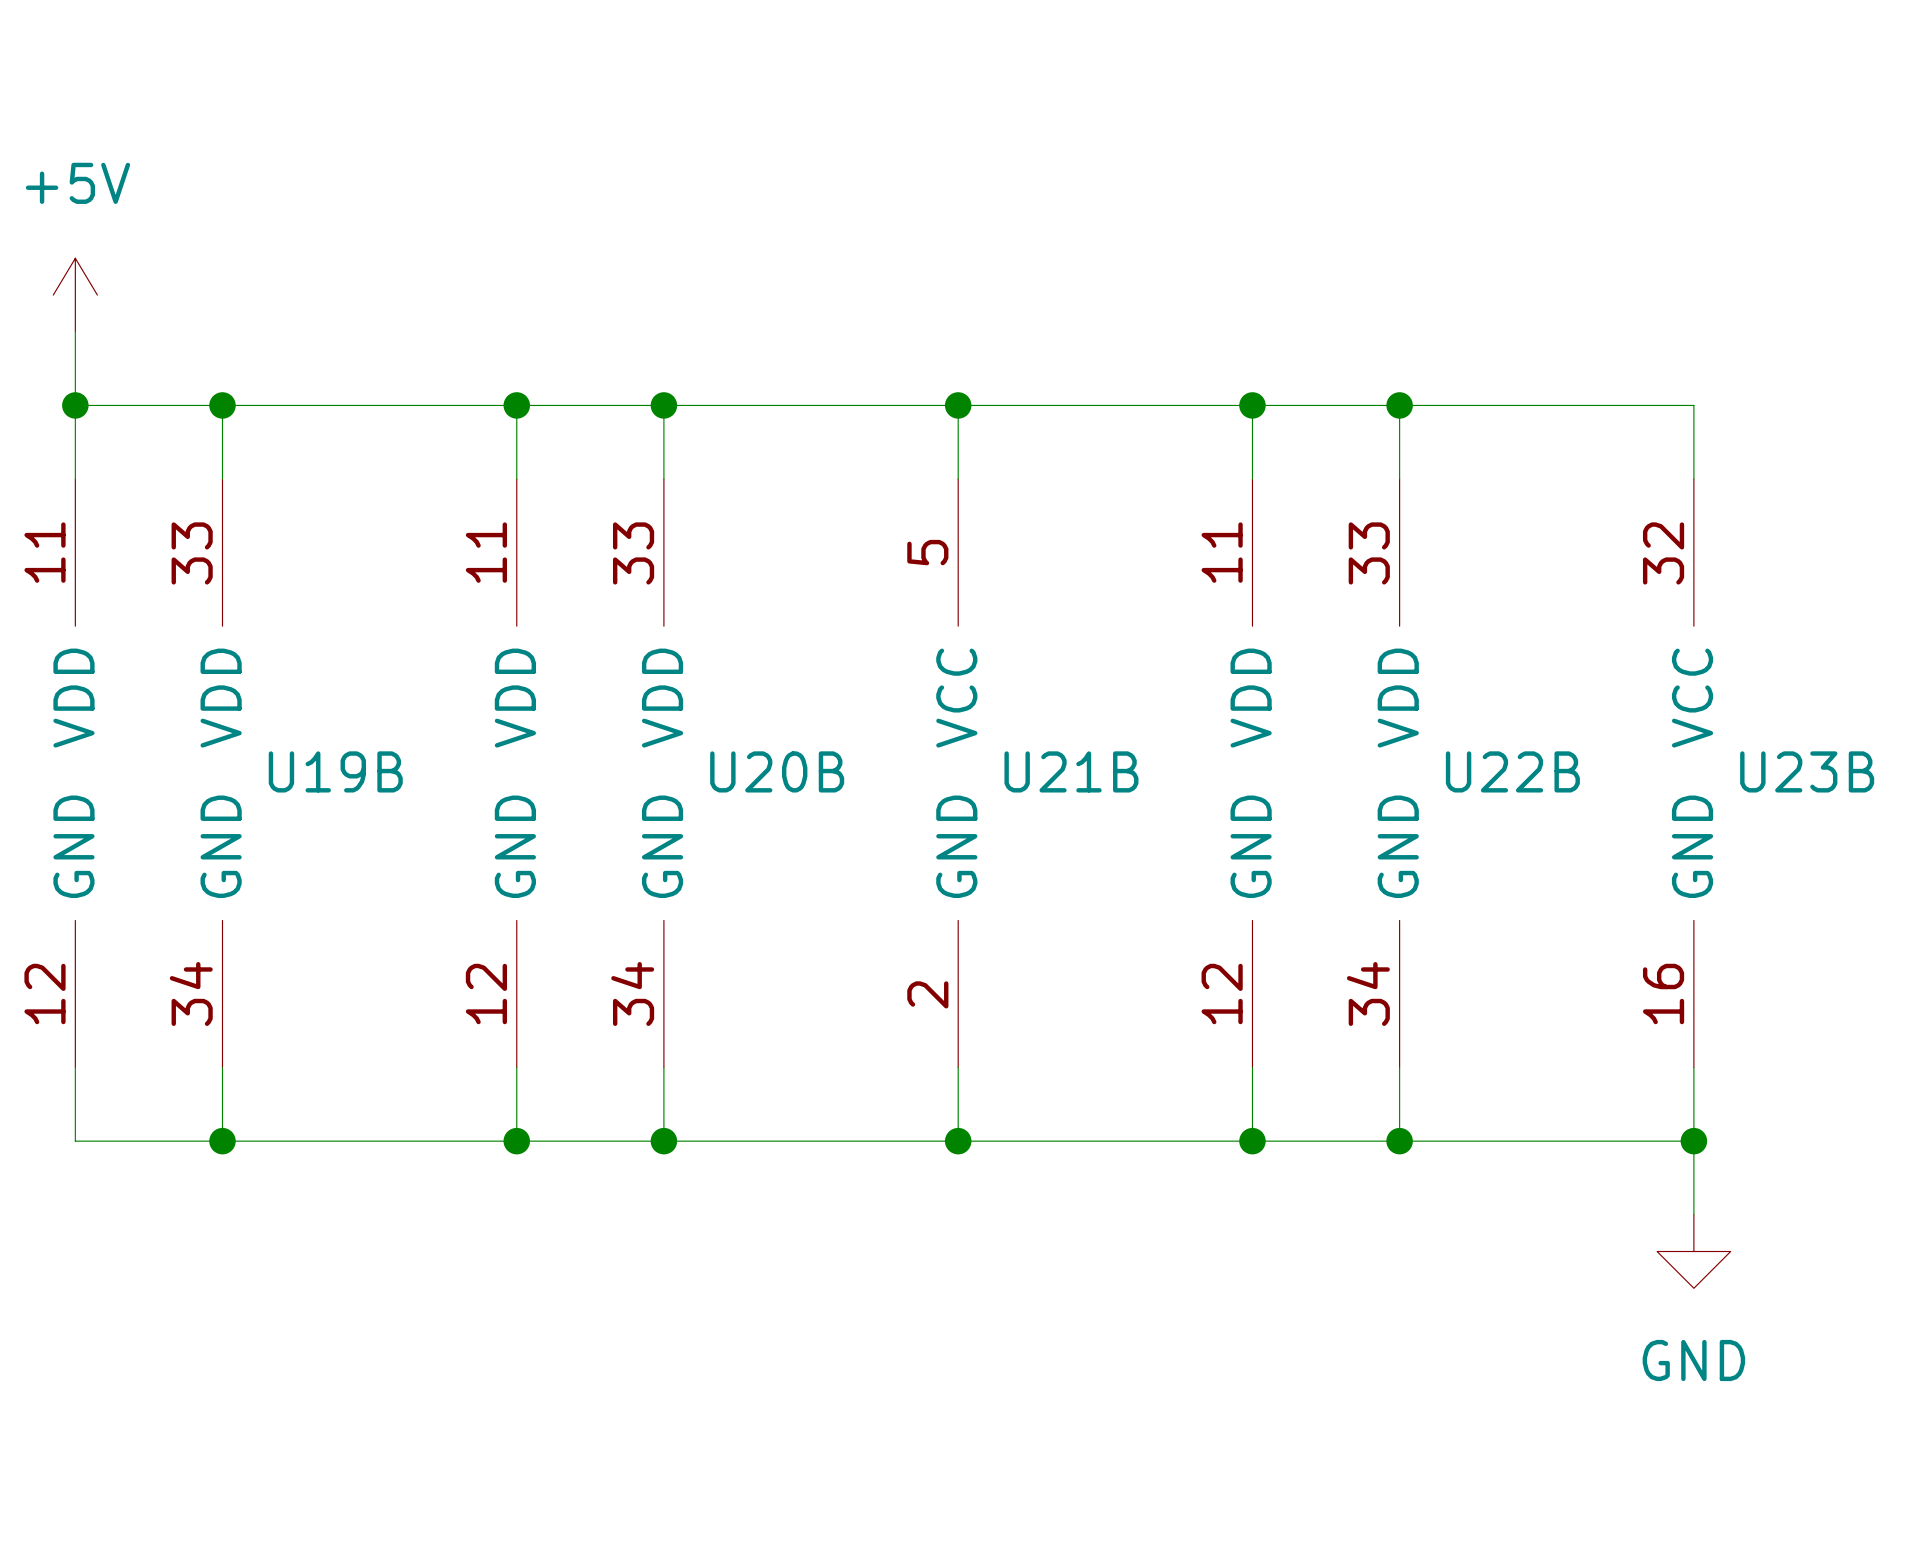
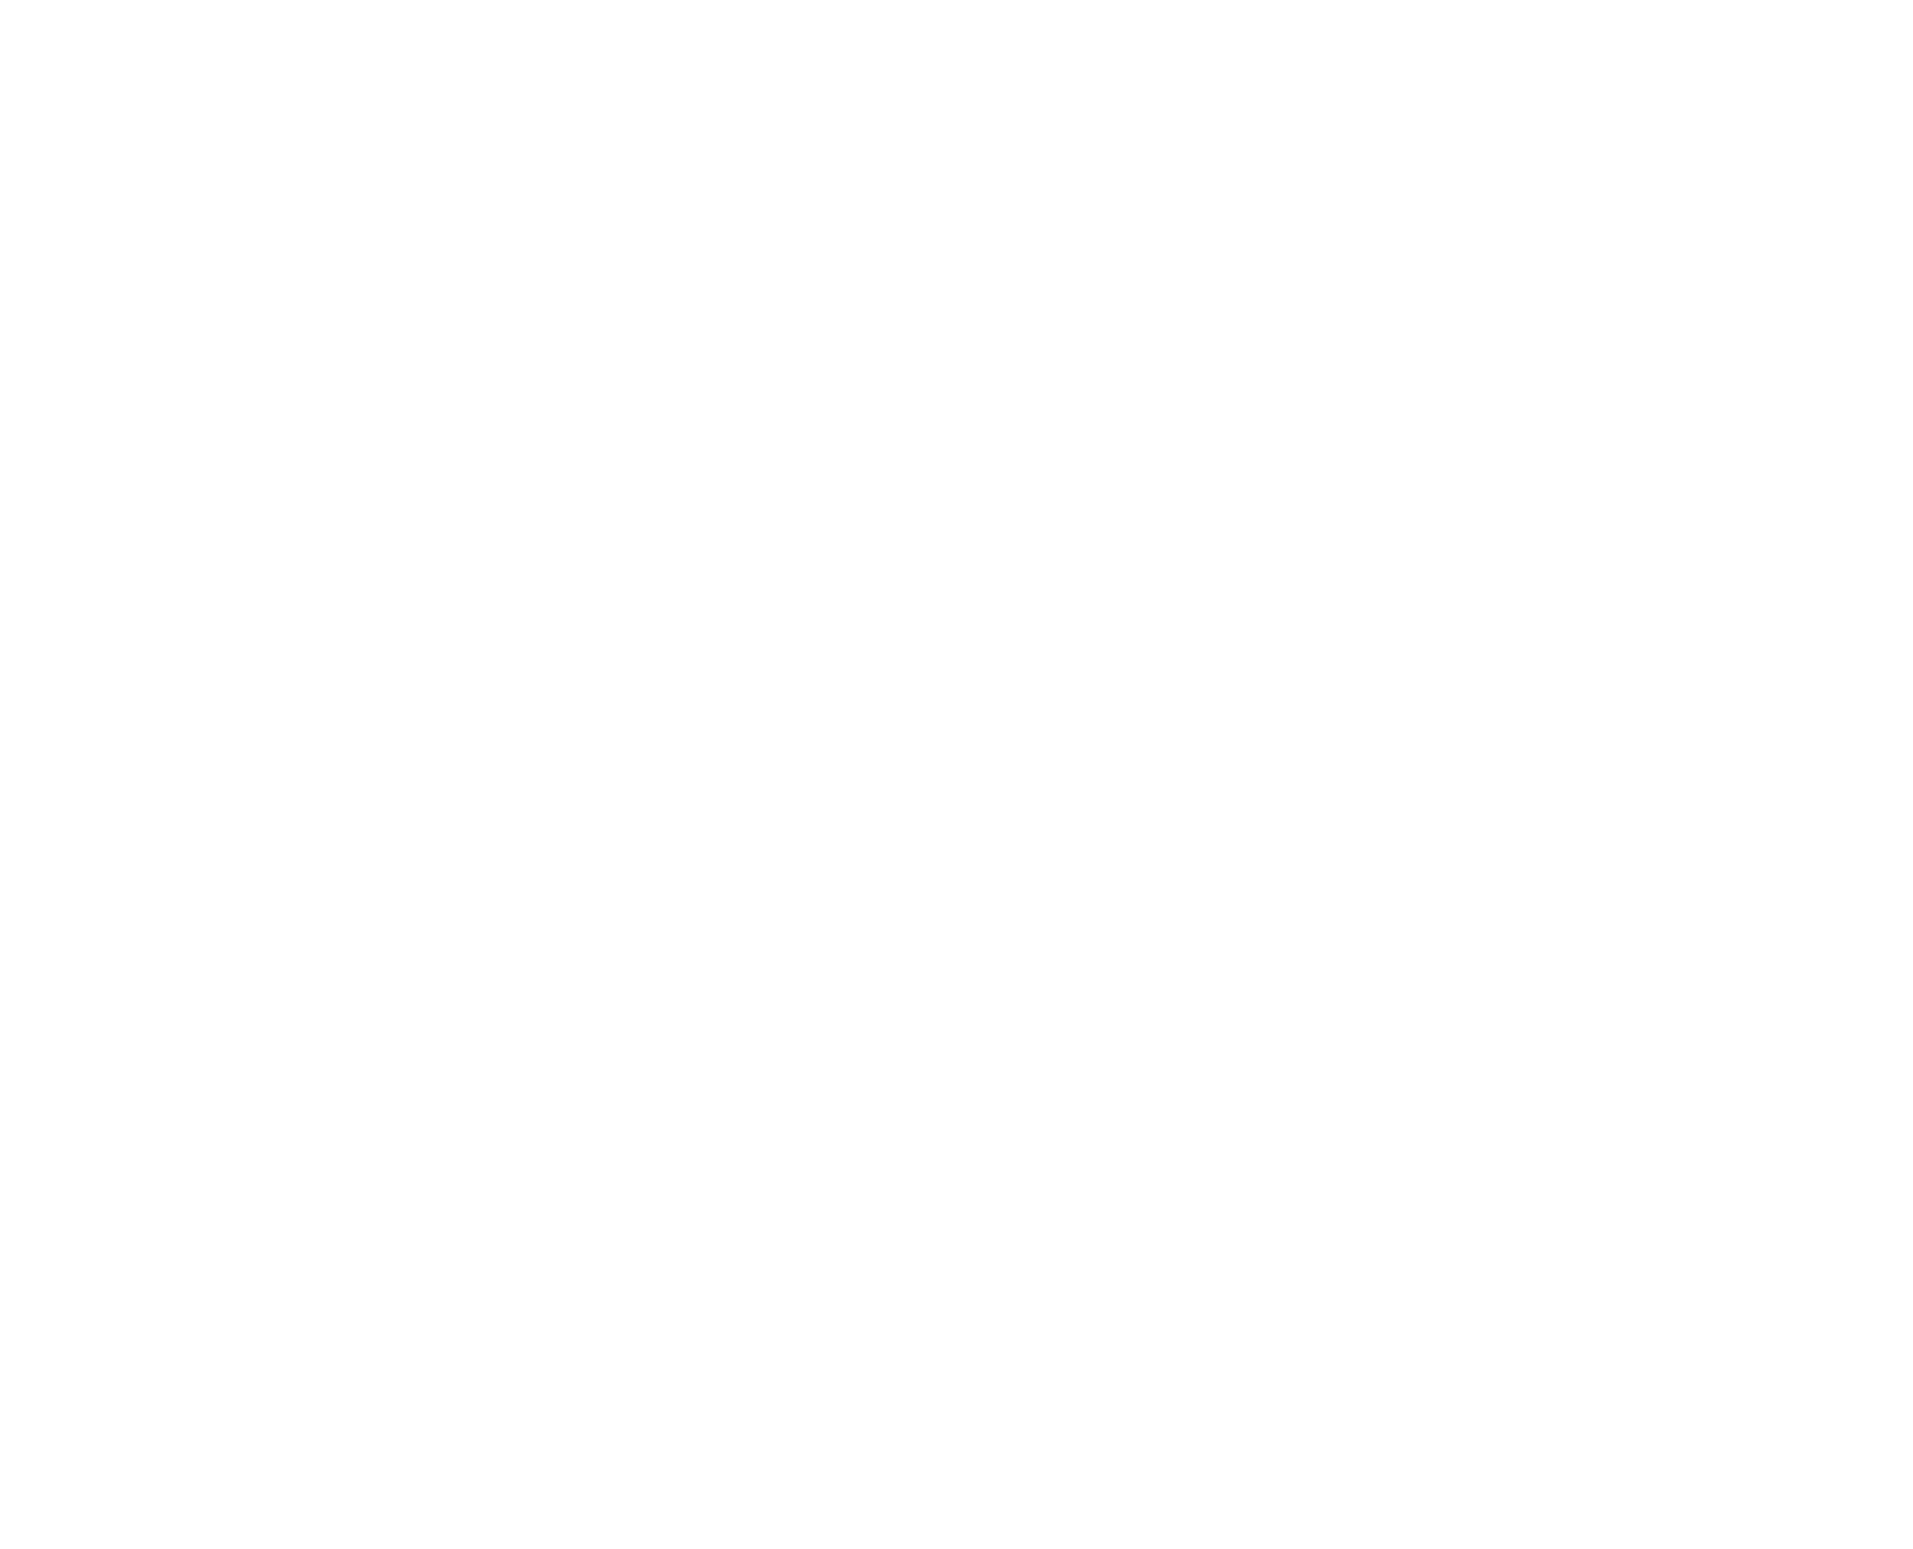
power symbol: +5V (75, 295) -> none
wire: (75, 331) (75, 479) -> none
wire: (75, 405) (1693, 405) (1693, 479) -> none
junction: (75, 405) -> none
wire: (222, 405) (222, 479) -> none
junction: (222, 405) -> none
wire: (516, 405) (516, 479) -> none
junction: (516, 405) -> none
wire: (663, 405) (663, 479) -> none
junction: (663, 405) -> none
wire: (958, 405) (958, 479) -> none
junction: (958, 405) -> none
wire: (1252, 405) (1252, 479) -> none
junction: (1252, 405) -> none
wire: (1399, 405) (1399, 479) -> none
junction: (1399, 405) -> none
U19B: (148, 773) -> none
U20B: (590, 773) -> none
U21B: (958, 773) -> none
U22B: (1326, 773) -> none
U23B: (1693, 773) -> none
wire: (75, 1067) (75, 1141) (1693, 1141) -> none
wire: (222, 1067) (222, 1141) -> none
wire: (516, 1067) (516, 1141) -> none
wire: (663, 1067) (663, 1141) -> none
wire: (958, 1067) (958, 1141) -> none
wire: (1252, 1067) (1252, 1141) -> none
wire: (1399, 1067) (1399, 1141) -> none
wire: (1693, 1067) (1693, 1214) -> none
junction: (222, 1141) -> none
junction: (516, 1141) -> none
junction: (663, 1141) -> none
junction: (958, 1141) -> none
junction: (1252, 1141) -> none
junction: (1399, 1141) -> none
junction: (1693, 1141) -> none
power symbol: GND (1693, 1251) -> none

